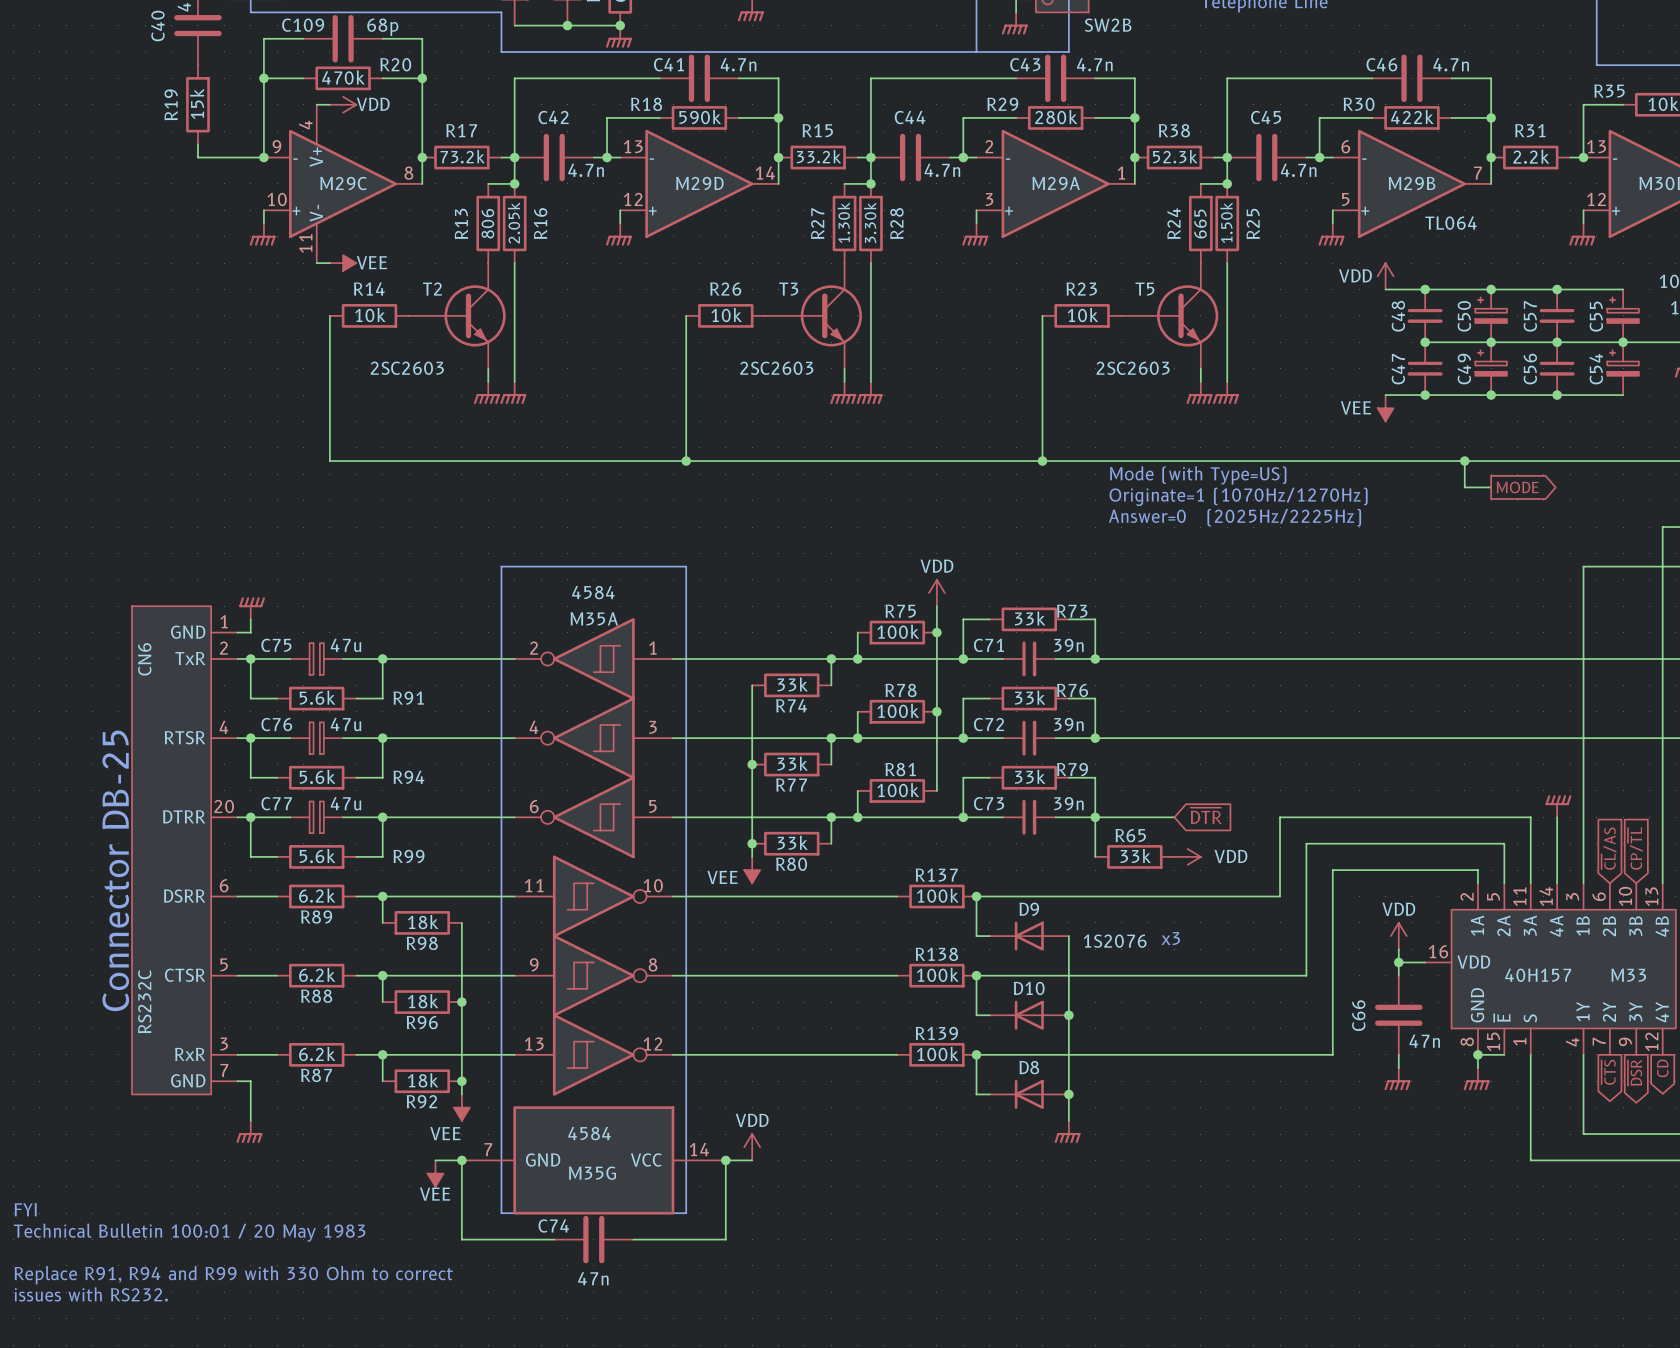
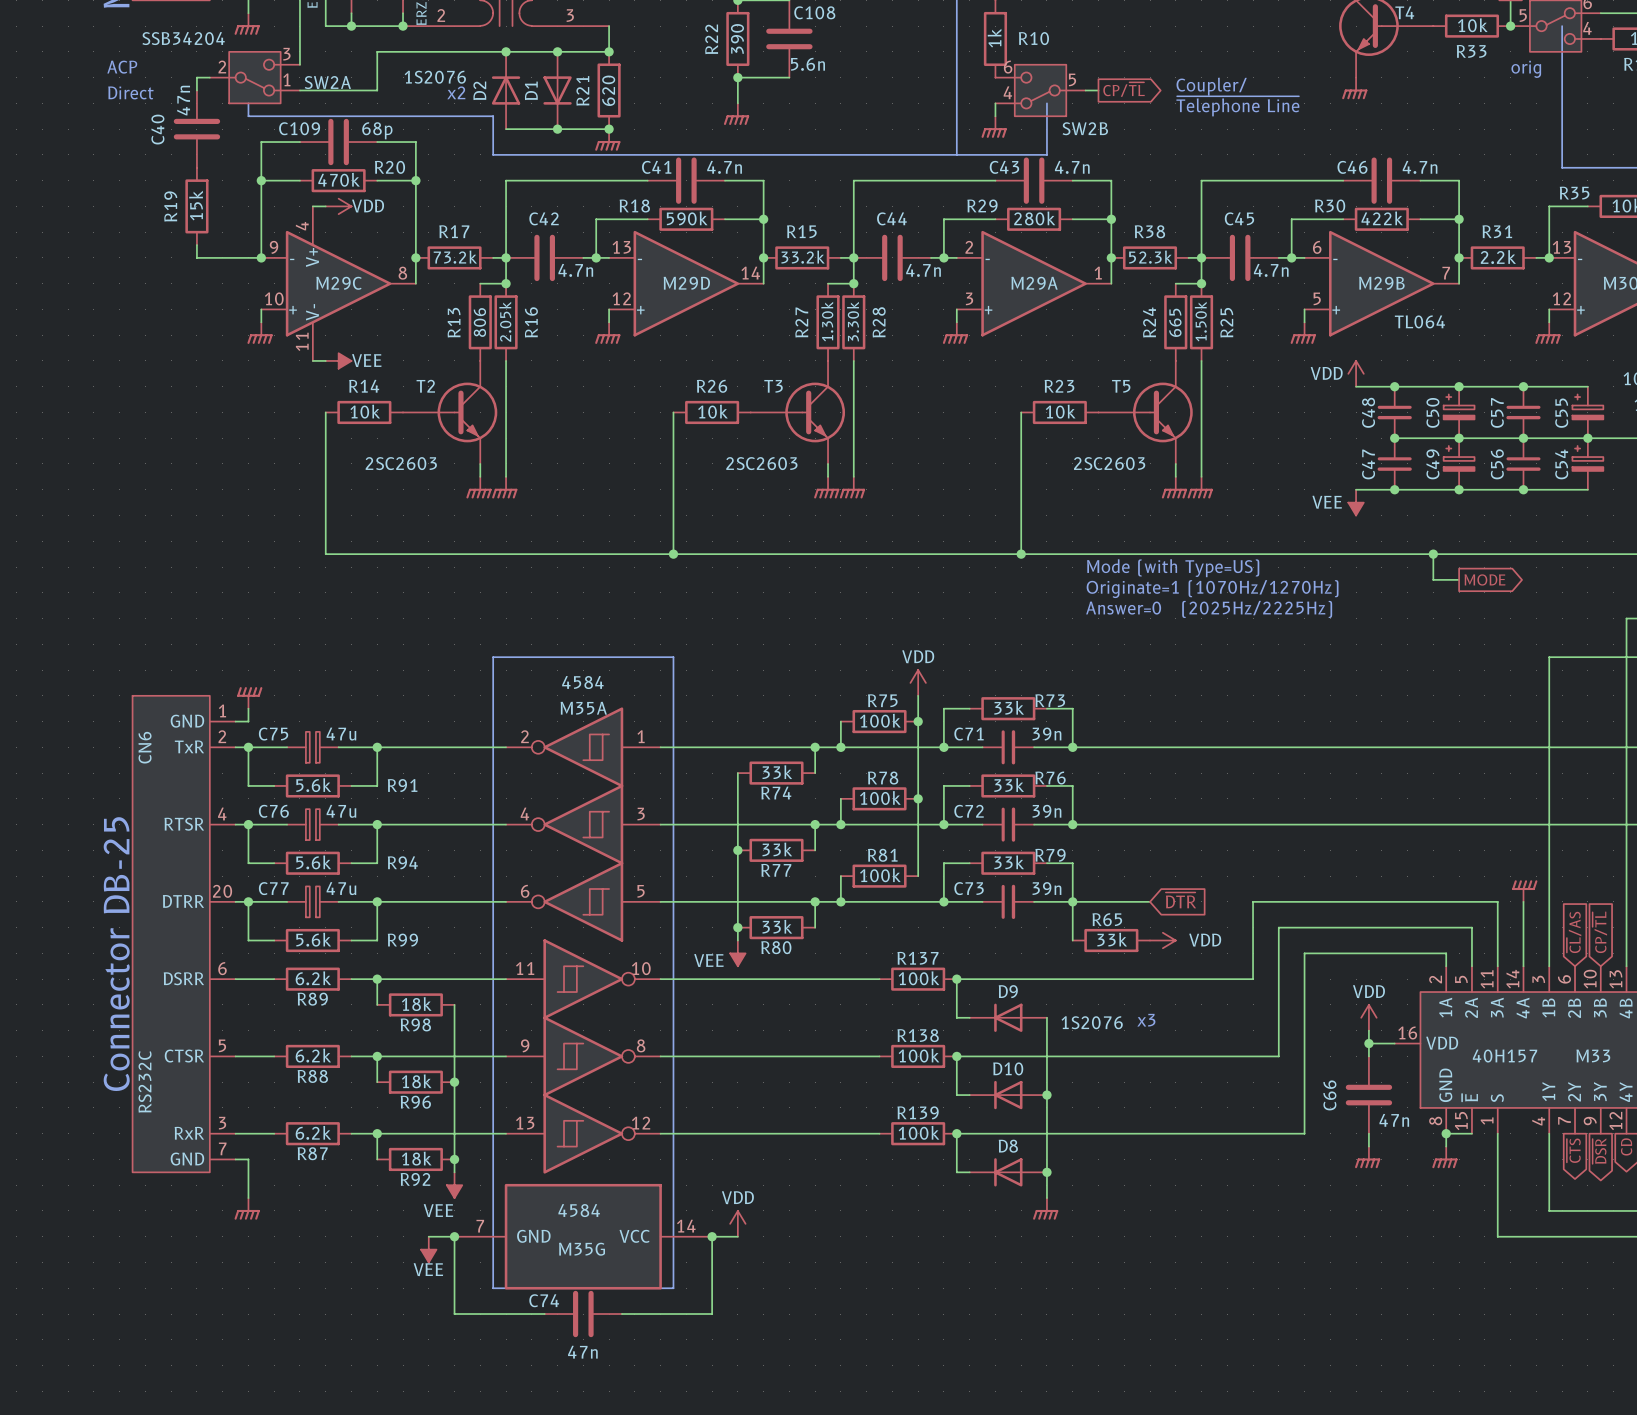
text: FYI (25, 1209) -> none
text: Technical Bulletin 100:01 / 20 May 1983 (189, 1232) -> none
text: Replace R91, R94 and R99 with 330 Ohm to correct (233, 1275) -> none
text: issues with RS232. (91, 1294) -> none

